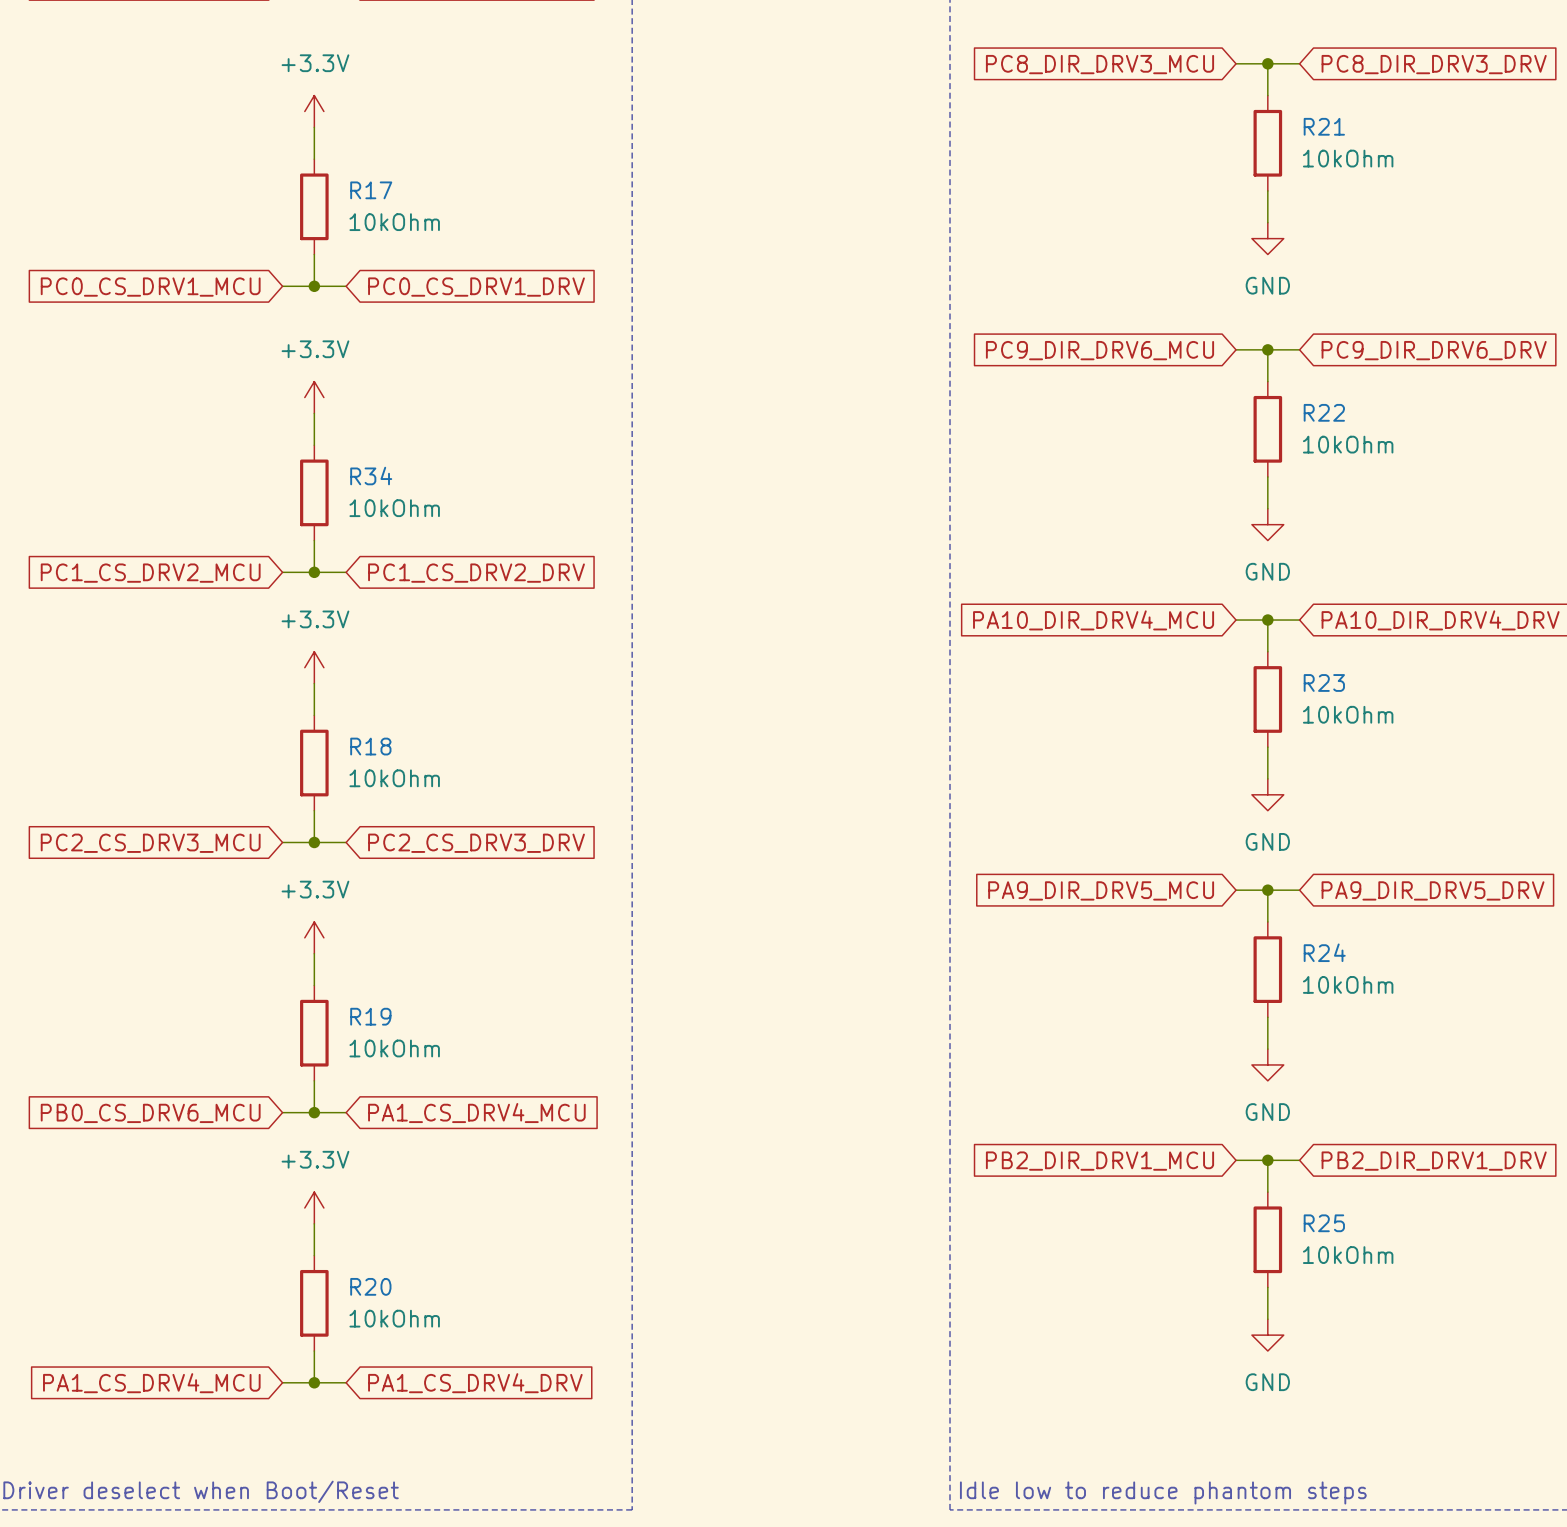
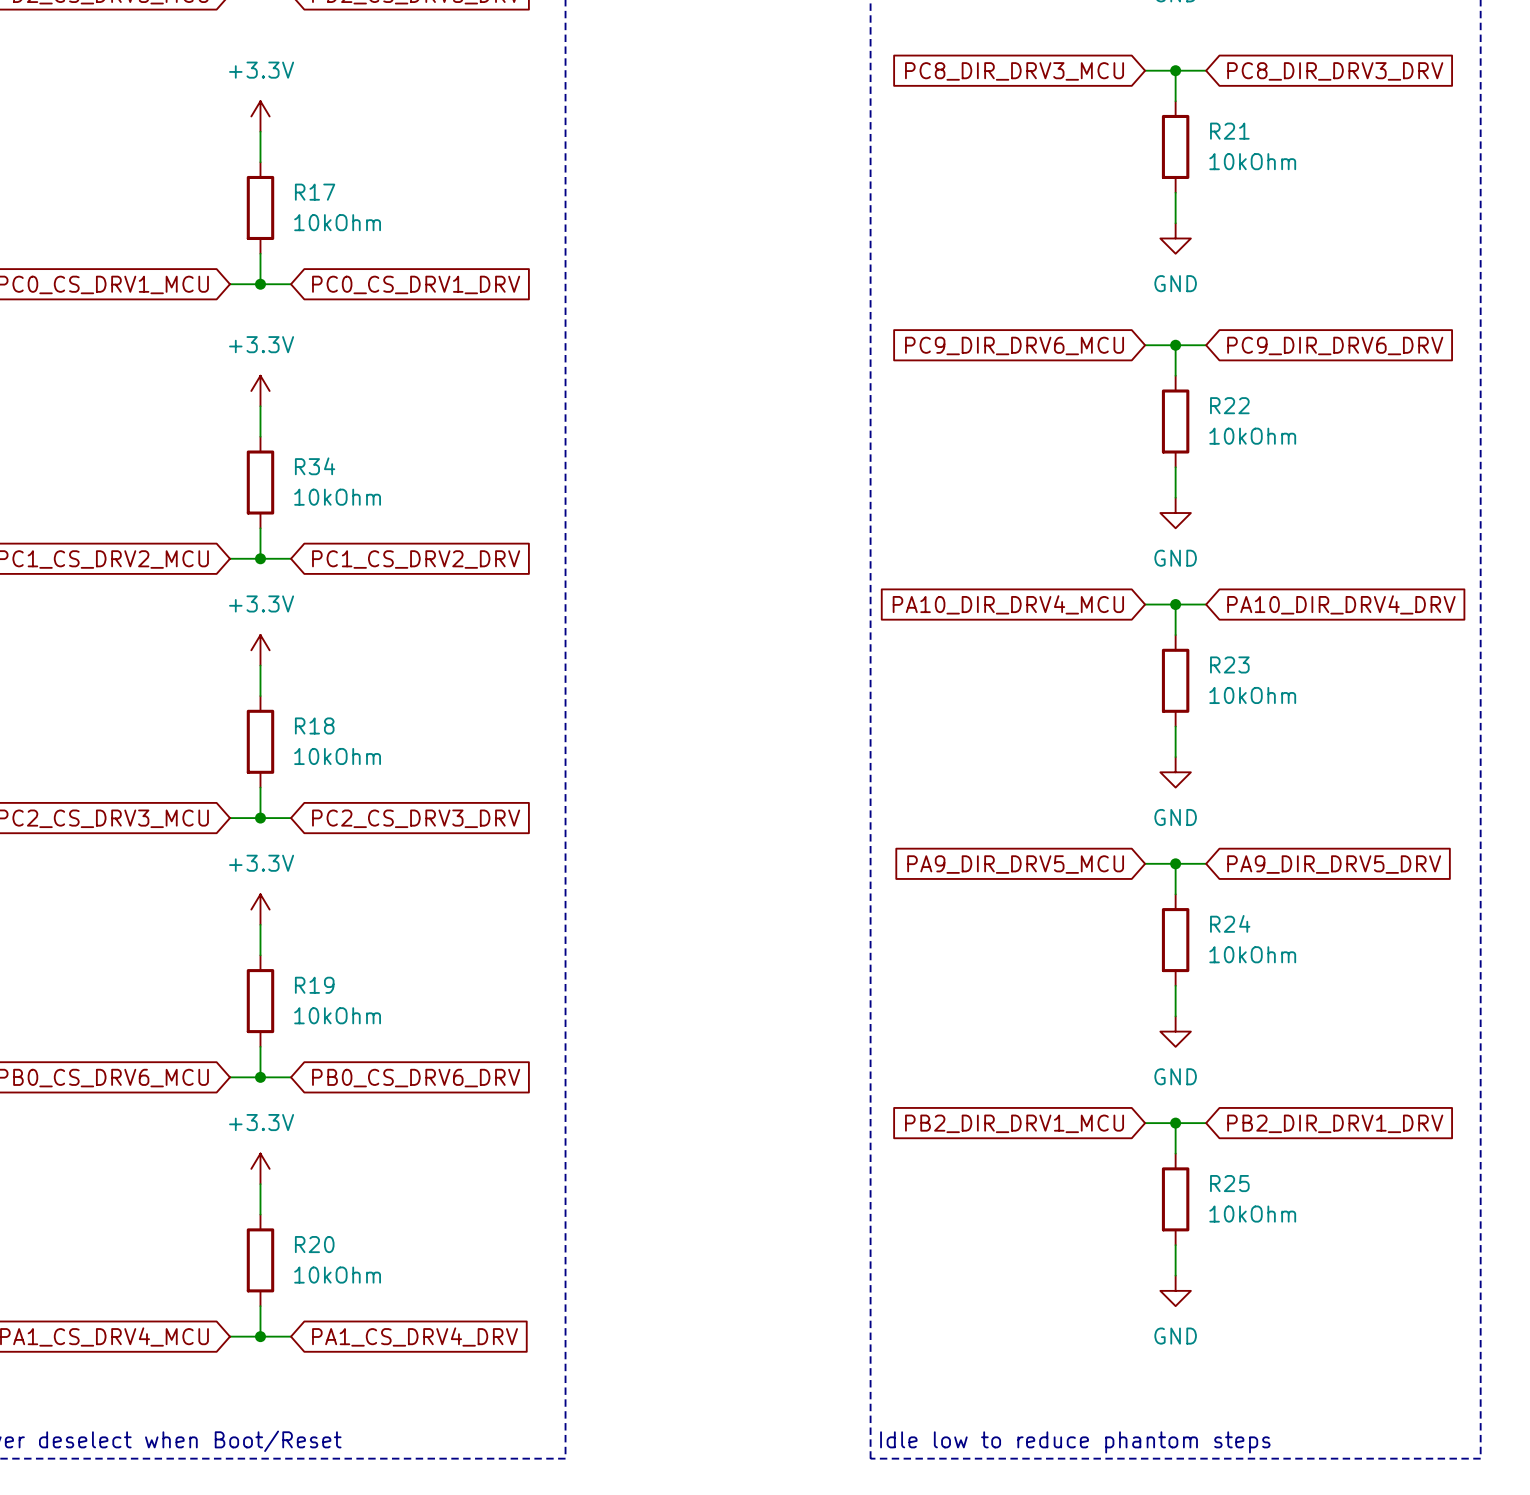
global label: PA1_CS_DRV4_MCU (476, 1113) -> PB0_CS_DRV6_DRV (416, 1078)

